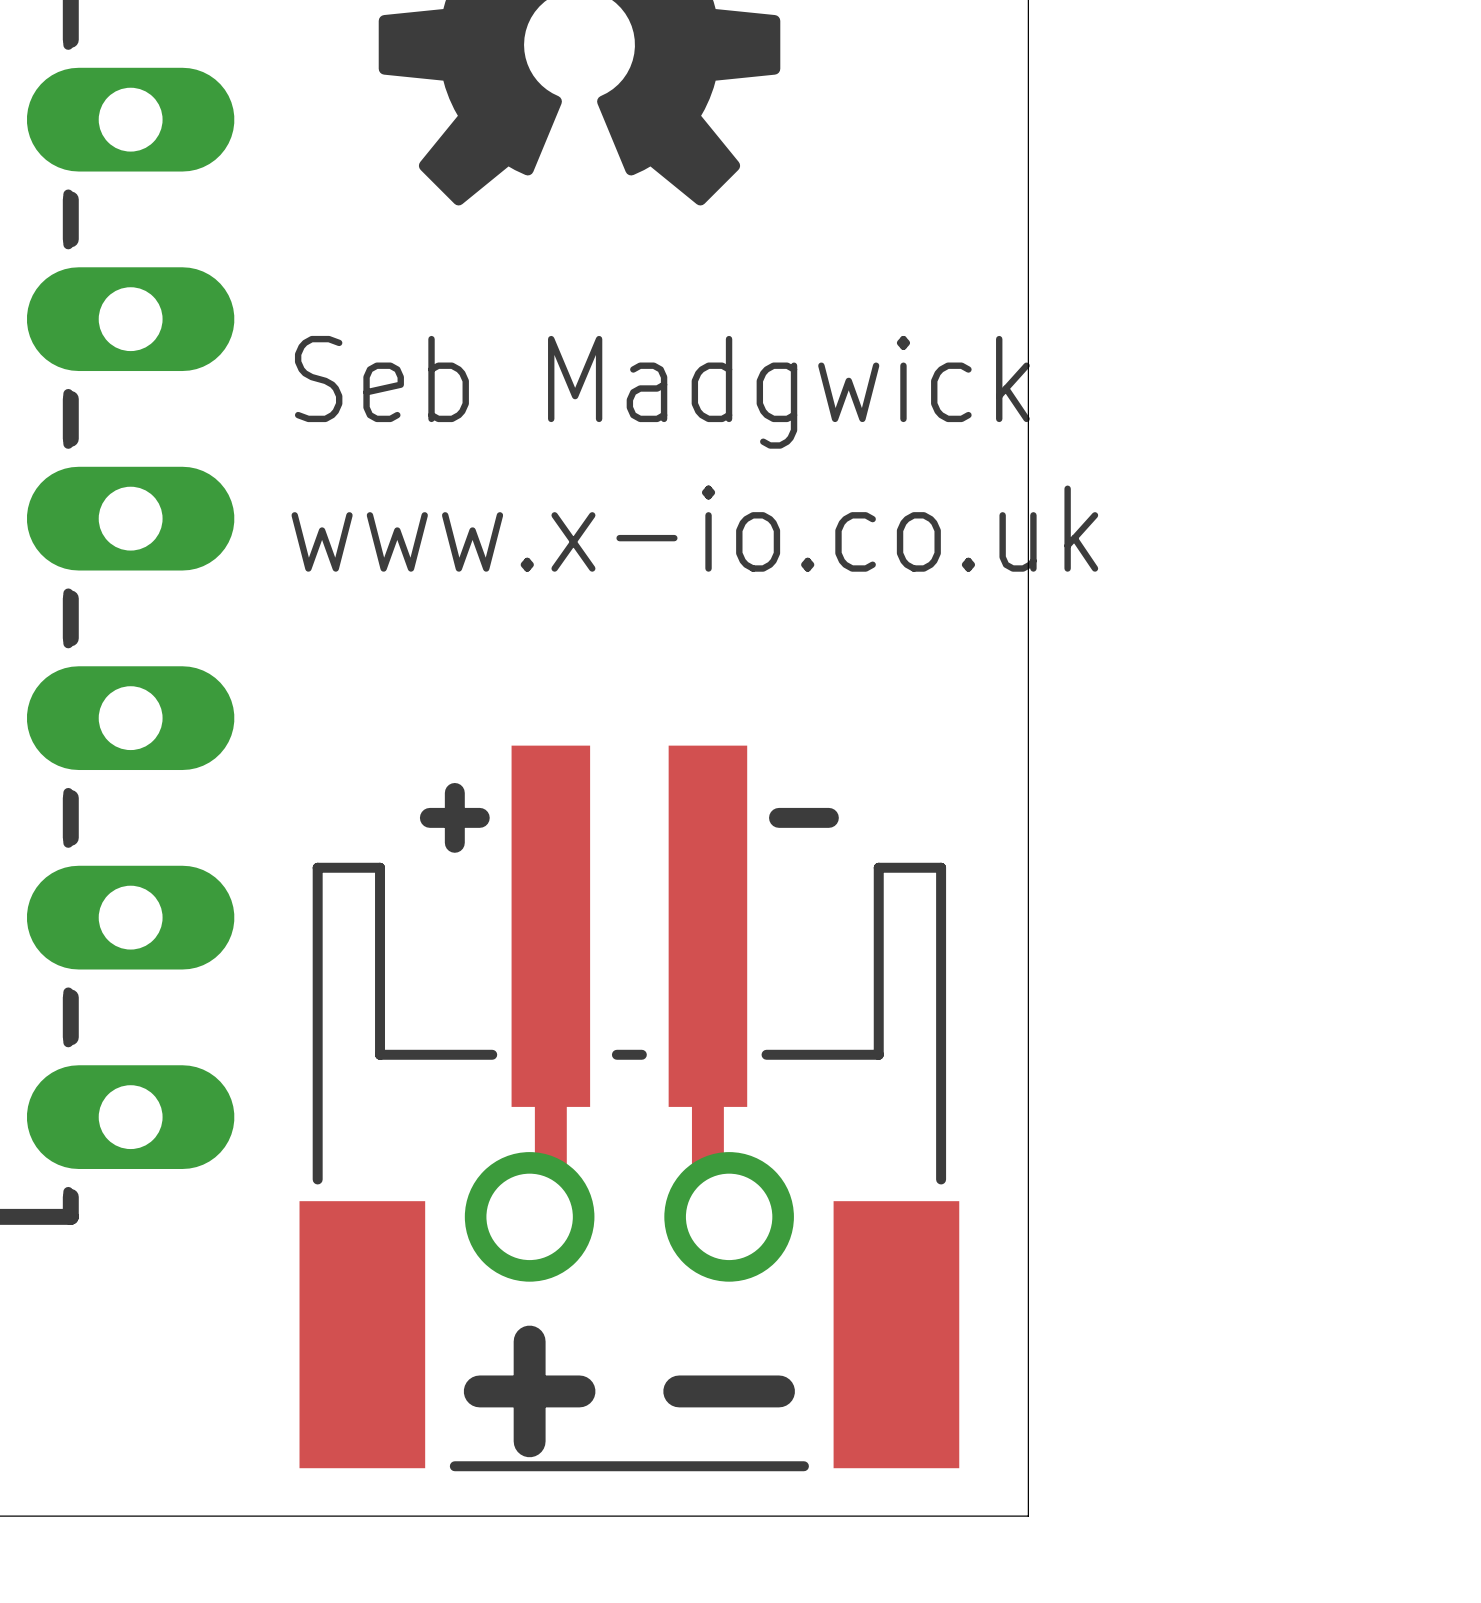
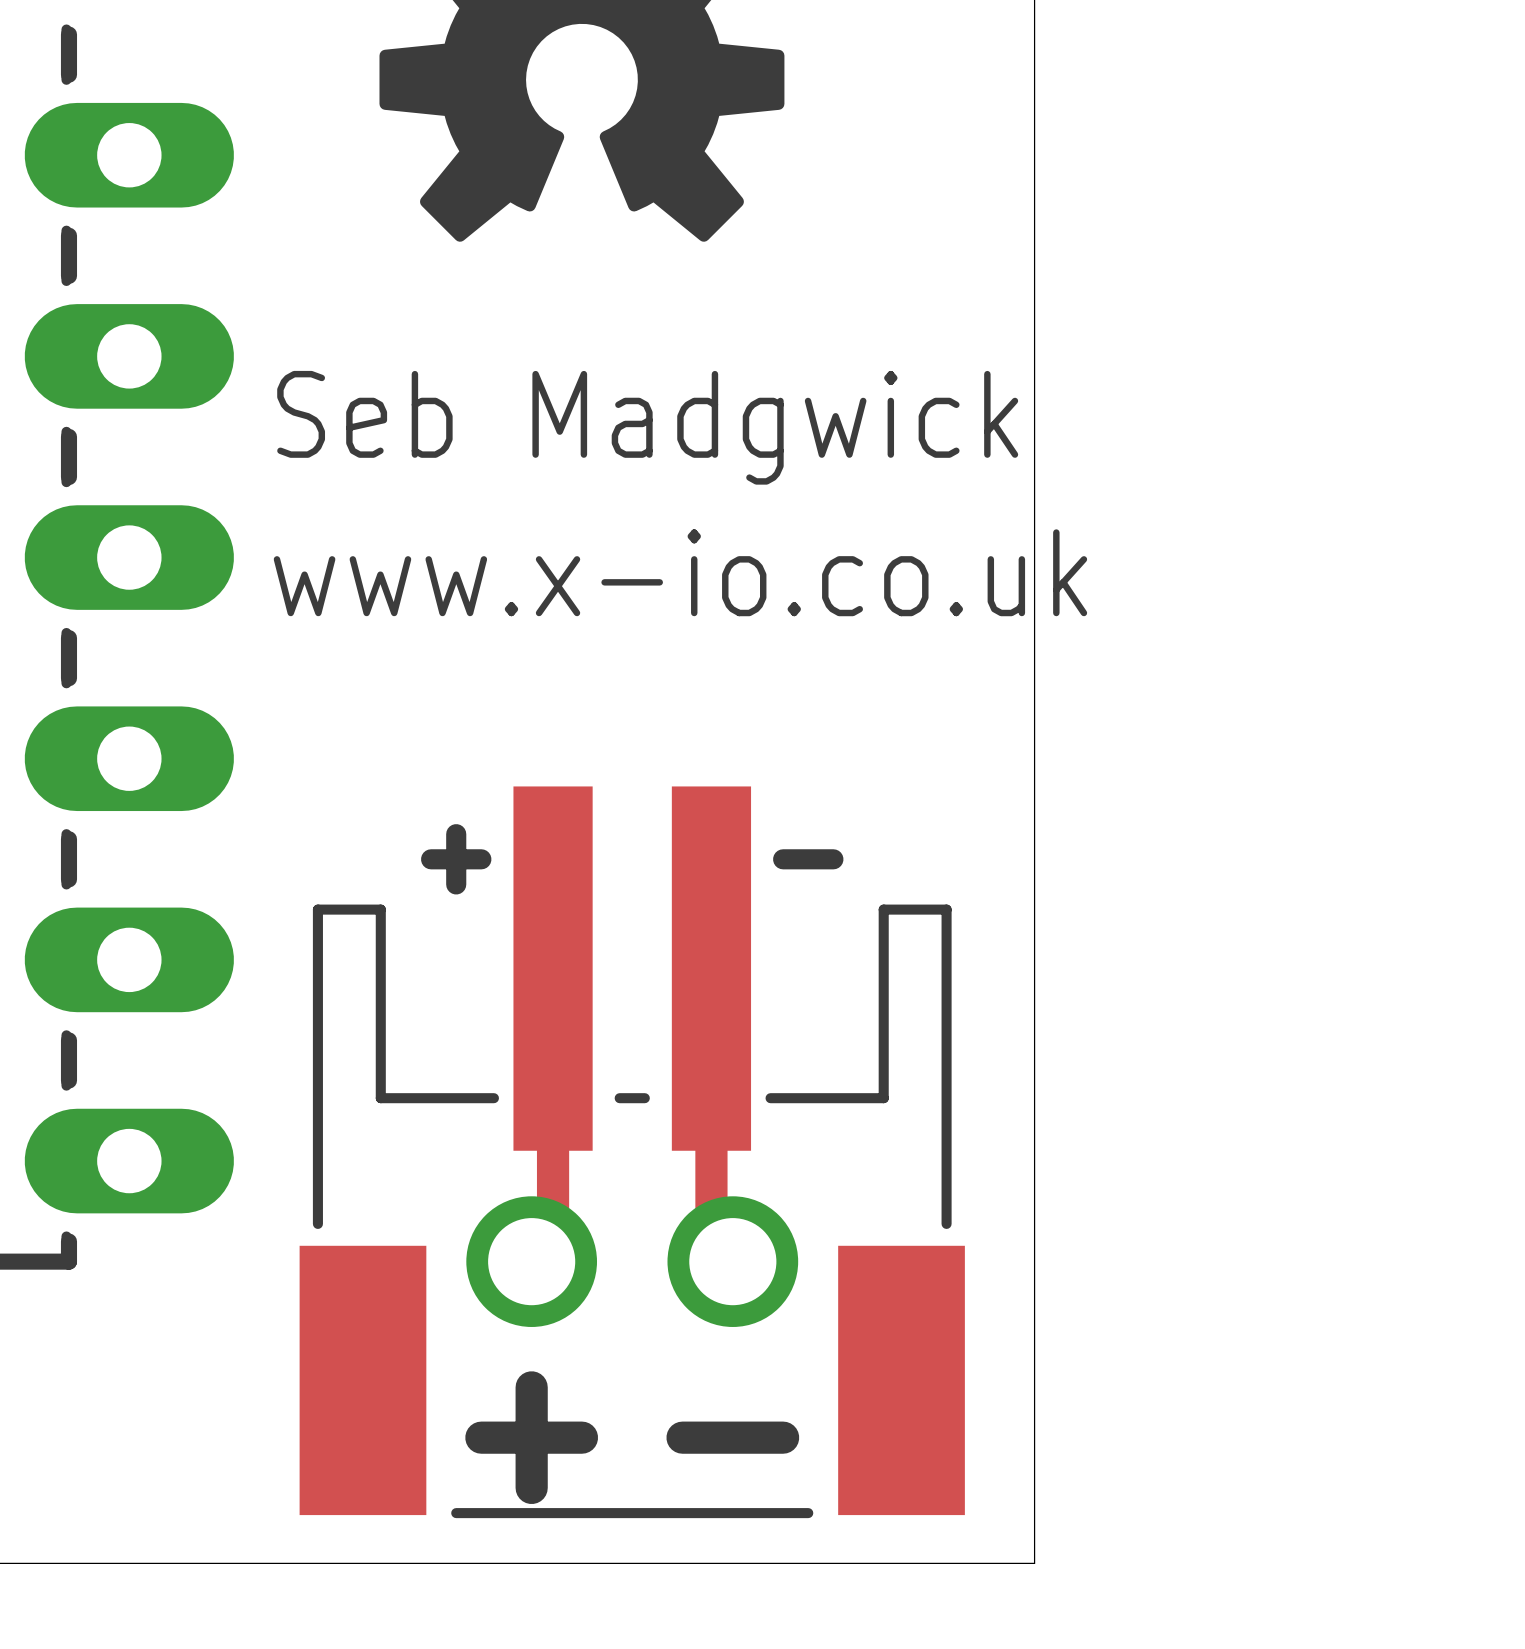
text position: Seb Madgwick (662, 392) -> Seb Madgwick (647, 427)
text position: www.x-io.co.uk (694, 528) -> www.x-io.co.uk (680, 572)

